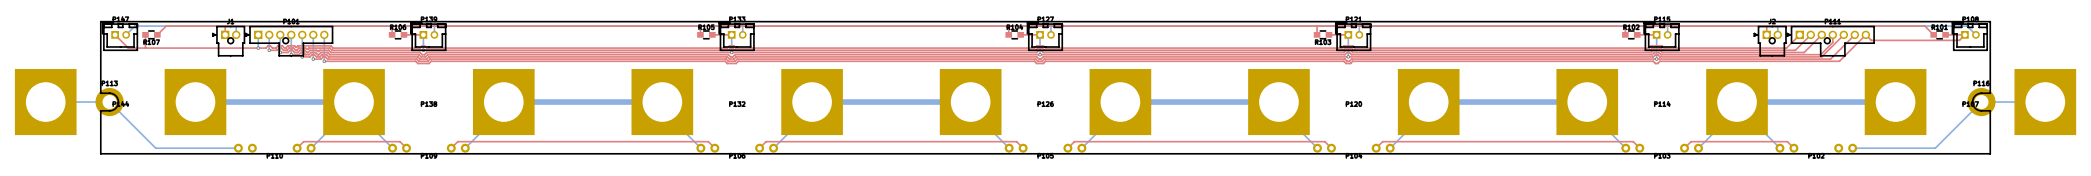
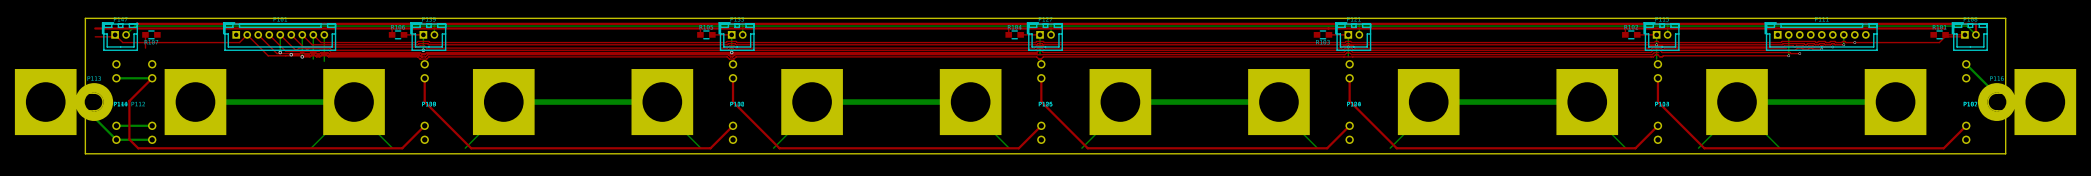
top track: none -> (137, 23) (1975, 23) (1975, 34)
top track: (225, 26) (225, 34) -> none
bottom track: (236, 26) (236, 34) -> none
part footprint: [245, 26, 333, 57] -> [223, 22, 336, 51]
top track: (1317, 26) (1317, 34) -> none
top track: (1766, 26) (1766, 34) -> none
bottom track: (1777, 26) (1777, 34) -> none
part footprint: [1787, 26, 1875, 57] -> [1764, 22, 1878, 51]
top track: none -> (95, 28) (1945, 28)
top track: none -> (115, 34) (113, 36) (95, 36)
top track: (157, 34) (166, 26) (1924, 26) (1933, 34) -> none
bottom track: (258, 34) (258, 48) -> none
top track: none -> (258, 34) (276, 53) (1037, 54)
bottom track: (269, 34) (269, 50) -> none
bottom track: (291, 34) (291, 54) -> none
top track: none -> (291, 34) (303, 46) (422, 45)
bottom track: none -> (1788, 34) (1788, 55)
top track: (1799, 34) (1786, 48) -> none
top track: (1810, 34) (1797, 48) -> (1821, 49) (1797, 48)
top track: (1821, 34) (1804, 52) (1789, 52) -> (1799, 53) (1789, 52)
top track: (1832, 34) (1831, 43) -> (1843, 44) (1831, 43)
bottom track: none -> (1843, 34) (1843, 44)
top track: (1843, 34) (1821, 56) (1662, 56) -> (1788, 55) (1662, 56)
top track: (1854, 34) (1830, 59) (1351, 59) (1349, 61) (1345, 59) (1044, 59) (1042, 61) (1035, 59) (737, 59) (735, 61) (728, 61) (726, 59) (430, 59) (427, 61) (419, 61) (416, 59) (327, 59) (325, 56) (313, 59) -> none
top track: (1962, 36) (1959, 40) (1871, 40) (1865, 34) (1839, 61) (1659, 61) (1657, 63) (1653, 61) (1352, 61) (1350, 63) (1343, 61) (1045, 61) (1043, 63) (1036, 63) (1034, 61) (738, 61) (736, 63) (727, 63) (725, 61) (431, 61) (428, 63) (417, 63) (415, 61) (324, 61) -> (1962, 36) (1945, 36) (1939, 42) (321, 42) (313, 34)
part: (228, 41) -> none
part: (1770, 41) -> none
top track: (122, 42) (128, 48) (265, 48) (268, 45) (272, 48) (278, 45) (284, 48) (287, 45) (420, 48) (422, 45) -> (122, 42) (239, 42) (247, 34) (268, 55) (422, 56)
via: none -> (1854, 42)
via: none -> (1656, 44)
top track: (1830, 44) (1820, 54) (1661, 54) (1658, 52) -> (1830, 44) (312, 44) (302, 34)
via: none -> (1843, 44)
top track: none -> (1832, 46) (1657, 48)
via: (258, 48) -> none
top track: (293, 48) (286, 50) (281, 48) (269, 50) -> (293, 48) (280, 34)
via: none -> (1821, 49)
via: (269, 50) -> none
top track: (317, 51) (309, 50) (306, 52) (300, 50) (294, 52) (290, 50) (287, 52) (280, 52) -> (317, 51) (285, 51) (269, 34)
via: none -> (1799, 53)
via: (1040, 54) -> none
via: none -> (1788, 55)
via: (1348, 56) -> none
via: (313, 59) -> none
via: (1656, 59) -> none
via: (324, 61) -> none
bottom track: none -> (1966, 64) (1996, 94) (1996, 102)
bottom track: none -> (116, 78) (152, 78)
top track: none -> (152, 78) (129, 101) (129, 139) (138, 148) (402, 148) (424, 125)
top track: none -> (424, 78) (424, 101) (471, 148) (710, 148) (733, 125)
top track: none -> (733, 78) (733, 101) (779, 148) (1018, 148) (1041, 125)
top track: none -> (1041, 78) (1041, 101) (1087, 148) (1327, 148) (1349, 125)
top track: none -> (1349, 78) (1349, 101) (1396, 148) (1635, 148) (1657, 125)
top track: none -> (1657, 78) (1657, 101) (1704, 148) (1943, 148) (1966, 125)
part footprint: [95, 87, 124, 117] -> [75, 83, 114, 121]
part footprint: [1967, 87, 1996, 117] -> [1977, 83, 2016, 121]
bottom track: (45, 102) (109, 102) (155, 148) (238, 148) -> none
bottom track: none -> (94, 102) (94, 117) (116, 139) (152, 139)
part: none -> (152, 102)
bottom track: (2045, 102) (1981, 102) (1935, 148) (1852, 148) -> none
bottom track: none -> (116, 125) (152, 125)
part footprint: [233, 143, 316, 153] -> [112, 60, 121, 144]
part footprint: [388, 143, 470, 153] -> [420, 60, 429, 144]
part footprint: [696, 143, 779, 153] -> [728, 60, 738, 144]
part footprint: [1004, 143, 1087, 153] -> [1037, 60, 1046, 144]
part footprint: [1313, 143, 1395, 153] -> [1345, 60, 1354, 144]
part footprint: [1621, 143, 1703, 153] -> [1653, 60, 1663, 144]
part footprint: [1775, 143, 1858, 153] -> [1962, 60, 1971, 144]
top track: (297, 148) (303, 141) (400, 141) (406, 148) -> none
top track: (451, 148) (457, 141) (708, 141) (714, 148) -> none
top track: (759, 148) (766, 141) (1016, 141) (1023, 148) -> none
top track: (1067, 148) (1074, 141) (1324, 141) (1331, 148) -> none
top track: (1376, 148) (1382, 141) (1633, 141) (1639, 148) -> none
top track: (1684, 148) (1691, 141) (1787, 141) (1793, 148) -> none
board edge: (100, 153) (100, 110) (113, 109) (118, 102) (113, 94) (100, 93) (100, 21) (1990, 21) (1990, 93) (1977, 94) (1972, 102) (1977, 109) (1990, 110) (1990, 153) -> (100, 153) (85, 153) (85, 110) (98, 109) (102, 102) (98, 94) (85, 93) (85, 18) (2005, 18) (2005, 93) (1992, 94) (1988, 102) (1992, 109) (2005, 110) (2005, 153) (1990, 153)

